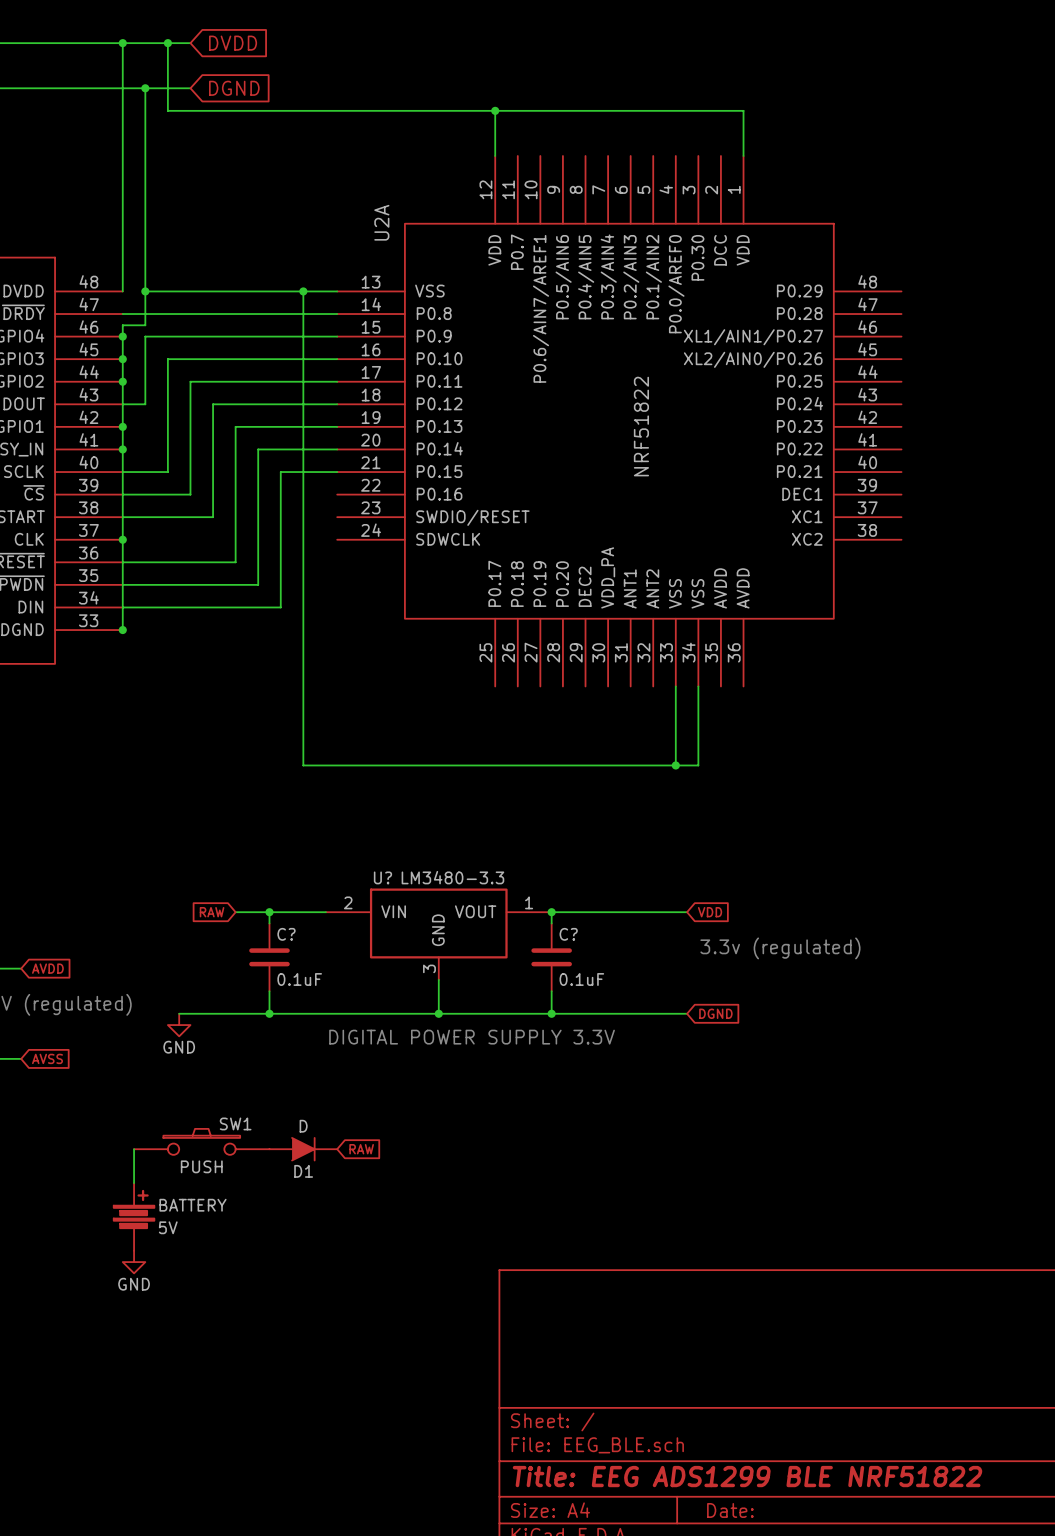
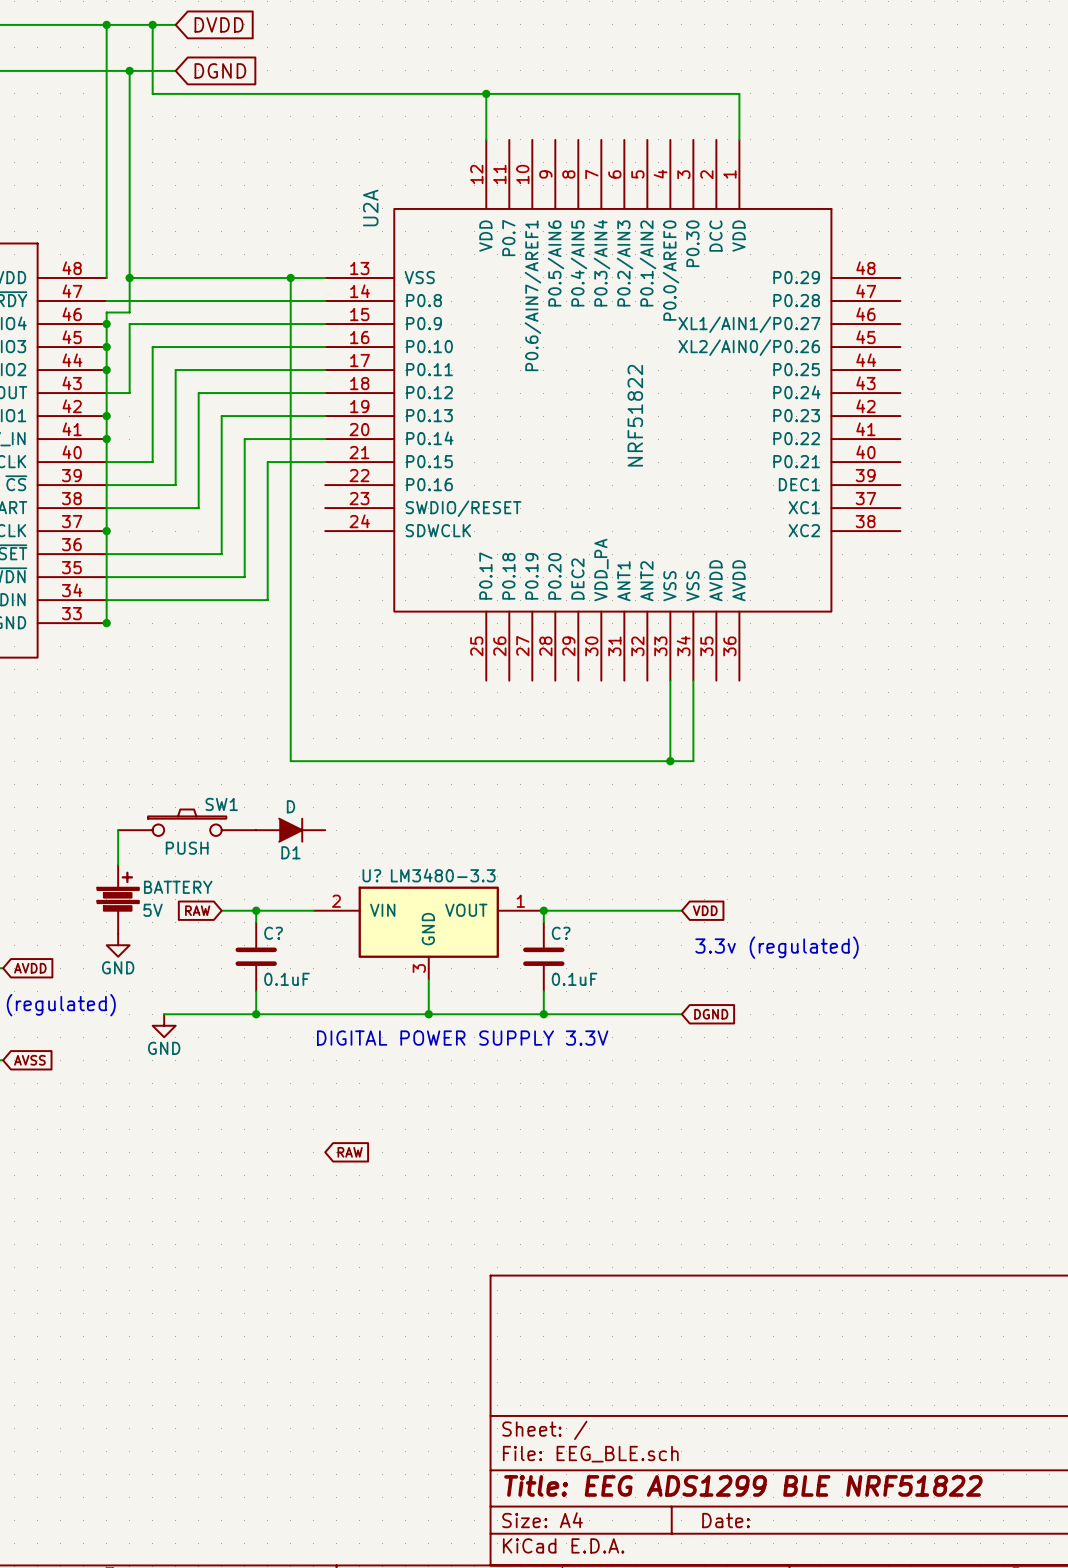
wire: none -> (118, 830) (118, 864)
BATTERY: none -> 5V (118, 899)
power symbol: none -> GND (118, 945)
SW1 position: (201, 1141) -> (187, 822)
wire: (134, 1149) (134, 1183) -> none
D1 position: (303, 1149) -> (290, 830)
BATTERY: 5V (134, 1216) -> none
power symbol: GND (134, 1262) -> none

